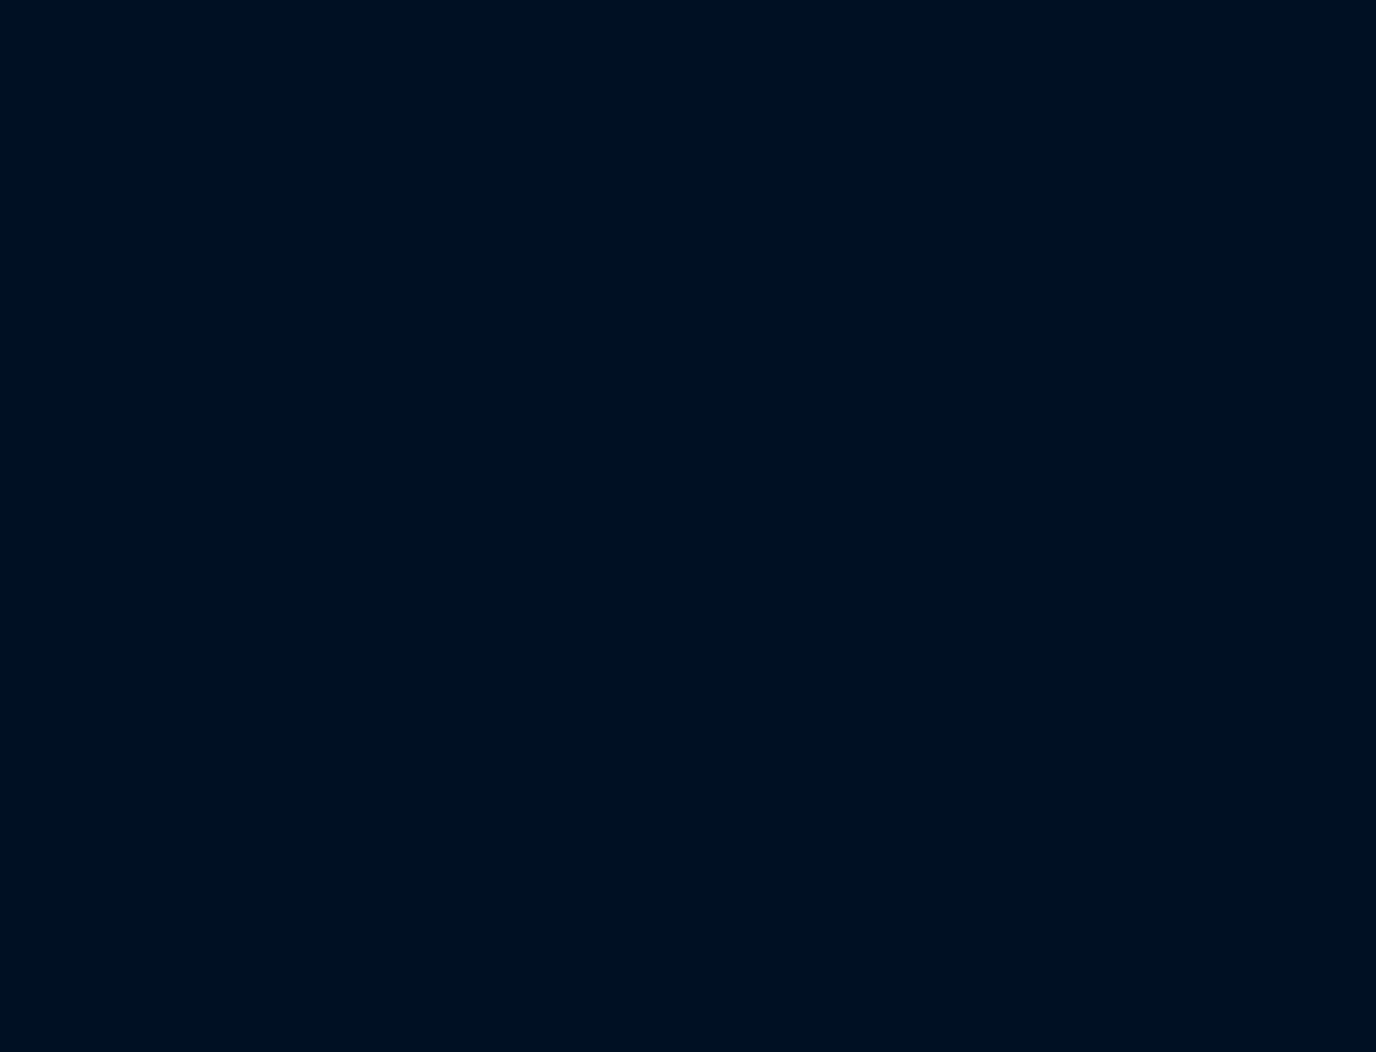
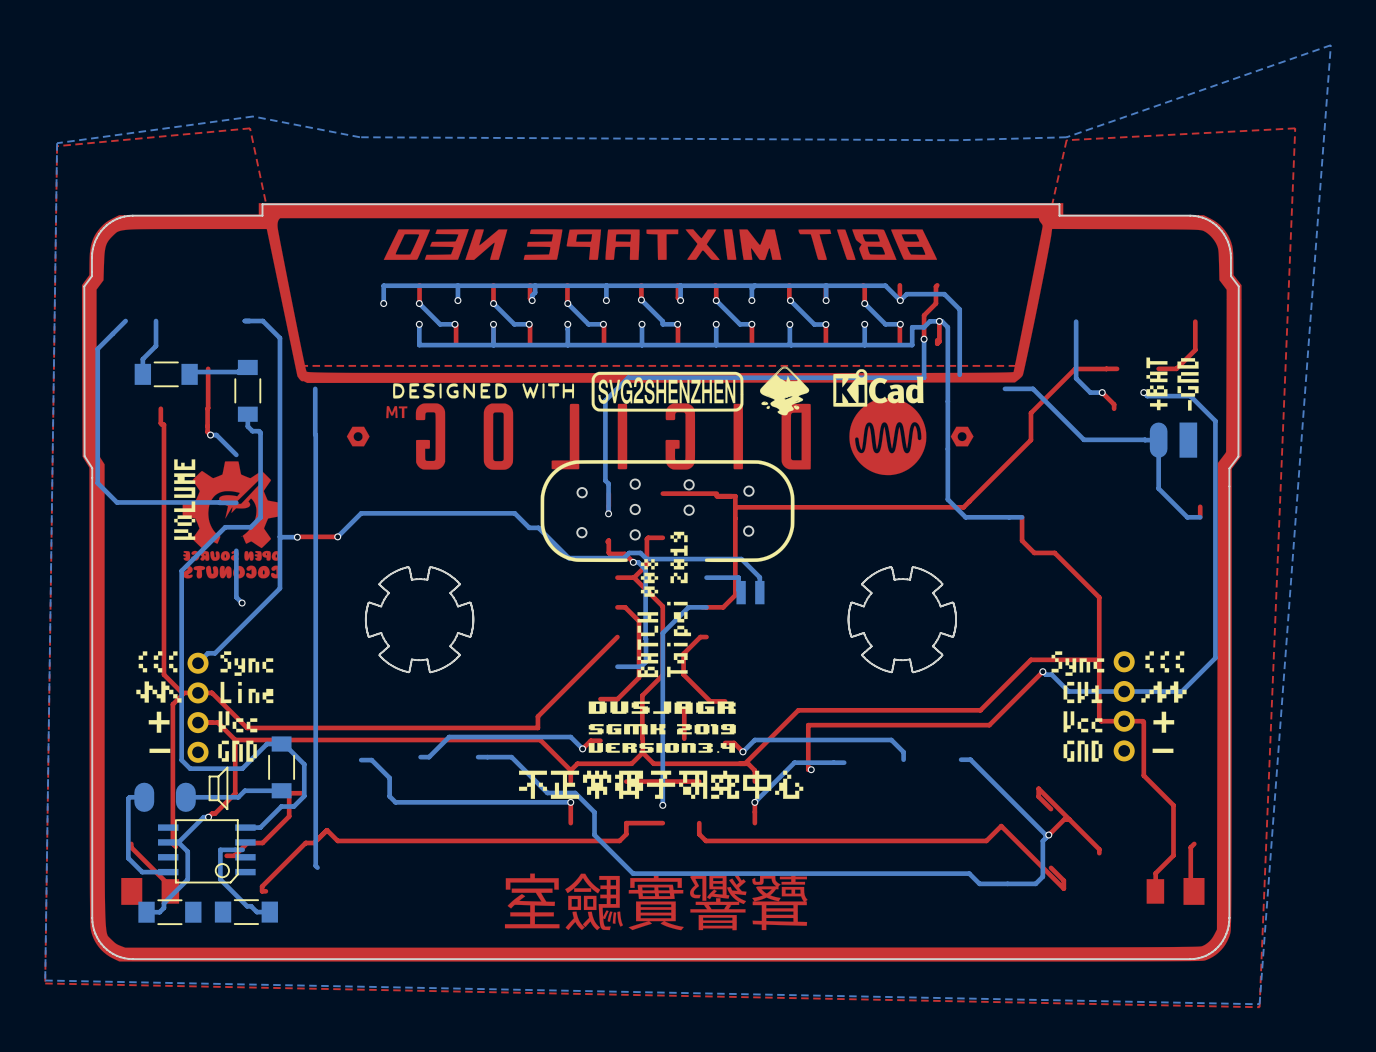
bottom zone outline: none -> (1330, 45) (1066, 137) (956, 140) (359, 137) (253, 116) (57, 143) (45, 980) (1259, 1004) (1330, 45)
top zone outline: none -> (1295, 128) (1066, 140) (1016, 365) (300, 365) (250, 128) (57, 146) (45, 983) (1259, 1007) (1295, 128)
drawing: none -> [81, 203, 1242, 962]
top track: none -> (419, 285) (419, 303)
bottom track: none -> (457, 285) (457, 300)
top track: none -> (493, 285) (493, 303)
top track: none -> (530, 285) (530, 298) (532, 300)
bottom track: none -> (535, 285) (532, 300)
top track: none -> (567, 285) (567, 303)
bottom track: none -> (606, 285) (606, 300)
top track: none -> (641, 285) (641, 299)
top track: none -> (677, 285) (677, 297) (680, 300)
bottom track: none -> (680, 285) (680, 300)
top track: none -> (715, 285) (716, 300)
bottom track: none -> (754, 285) (751, 288) (751, 300)
top track: none -> (789, 285) (790, 300)
bottom track: none -> (826, 285) (826, 300)
top track: none -> (863, 285) (864, 303)
top track: none -> (899, 285) (900, 300)
top track: none -> (937, 285) (935, 303) (924, 315) (924, 339)
bottom track: none -> (641, 299) (662, 321) (662, 324) (677, 324)
via: none -> (641, 299)
via: none -> (457, 300)
via: none -> (532, 300)
via: none -> (606, 300)
via: none -> (680, 300)
bottom track: none -> (716, 300) (740, 324) (751, 324)
via: none -> (716, 300)
via: none -> (751, 300)
bottom track: none -> (790, 300) (814, 324) (825, 324)
via: none -> (790, 300)
via: none -> (826, 300)
via: none -> (900, 300)
bottom track: none -> (383, 303) (383, 285) (885, 285) (900, 300) (906, 294) (944, 294) (959, 309) (959, 374)
via: none -> (383, 303)
bottom track: none -> (419, 303) (440, 324) (454, 324)
via: none -> (419, 303)
bottom track: none -> (493, 303) (514, 324) (529, 324)
via: none -> (493, 303)
bottom track: none -> (567, 303) (588, 324) (603, 324)
via: none -> (567, 303)
bottom track: none -> (864, 303) (885, 324) (900, 324)
via: none -> (864, 303)
bottom track: none -> (125, 321) (97, 348) (97, 483) (116, 502) (236, 502)
bottom track: none -> (156, 321) (156, 346) (142, 359) (142, 374)
bottom track: none -> (244, 321) (262, 321) (279, 338) (279, 588) (215, 653) (207, 653) (198, 663)
top track: none -> (939, 321) (939, 341) (937, 343) (937, 340)
via: none -> (939, 321)
bottom track: none -> (1076, 321) (1076, 378) (1090, 392) (1102, 392)
top track: none -> (1195, 321) (1195, 349) (1176, 368) (1158, 368)
bottom track: none -> (419, 324) (419, 345) (912, 345) (912, 327) (924, 327) (930, 321) (941, 321) (947, 327) (947, 499) (965, 517) (1022, 517)
via: none -> (419, 324)
top track: none -> (454, 324) (456, 343)
via: none -> (454, 324)
bottom track: none -> (493, 324) (493, 345)
via: none -> (493, 324)
top track: none -> (529, 324) (530, 343)
via: none -> (529, 324)
bottom track: none -> (567, 324) (567, 345)
via: none -> (567, 324)
top track: none -> (603, 324) (604, 343)
via: none -> (603, 324)
bottom track: none -> (642, 324) (642, 345)
via: none -> (642, 324)
top track: none -> (677, 324) (677, 343)
via: none -> (677, 324)
bottom track: none -> (716, 324) (716, 345)
via: none -> (716, 324)
top track: none -> (751, 324) (751, 343)
via: none -> (751, 324)
bottom track: none -> (789, 324) (791, 345)
via: none -> (789, 324)
top track: none -> (825, 324) (825, 343)
via: none -> (825, 324)
bottom track: none -> (864, 324) (864, 345)
via: none -> (864, 324)
top track: none -> (900, 324) (899, 343)
via: none -> (900, 324)
bottom track: none -> (924, 339) (924, 377) (628, 377) (605, 400) (605, 480) (608, 483) (608, 513)
via: none -> (924, 339)
bottom track: none -> (247, 367) (242, 367) (238, 372) (191, 372) (189, 374)
top track: none -> (208, 368) (207, 432) (210, 435)
top track: none -> (1106, 368) (1075, 368) (1030, 413) (1030, 439) (963, 507) (735, 507)
top track: none -> (1117, 368) (1106, 368)
part: none -> (166, 374)
bottom track: none -> (315, 388) (315, 865) (317, 867)
bottom track: none -> (1004, 388) (1033, 388) (1083, 439) (1158, 440) (1158, 488) (1187, 517) (1200, 517)
part: none -> (247, 390)
top track: none -> (1102, 392) (1114, 404) (1114, 408)
via: none -> (1102, 392)
bottom track: none -> (1143, 392) (1147, 396) (1190, 396) (1215, 421) (1215, 658) (1181, 691) (1068, 691) (1051, 674) (1045, 674) (1042, 671)
via: none -> (1143, 392)
top track: none -> (160, 408) (160, 423) (163, 424) (163, 674) (182, 692)
bottom track: none -> (247, 414) (247, 426) (252, 431) (260, 432) (260, 517) (250, 527) (225, 527) (181, 570) (181, 760) (190, 768) (242, 768) (266, 743) (283, 743) (304, 764) (304, 796) (293, 806) (281, 806) (260, 827) (245, 827)
bottom track: none -> (210, 435) (216, 435) (236, 454)
via: none -> (210, 435)
part: none -> (1173, 440)
part: none -> (635, 484)
part: none -> (689, 484)
part: none -> (748, 491)
part: none -> (582, 492)
top track: none -> (716, 493) (662, 493)
top track: none -> (716, 496) (735, 496) (735, 595) (723, 607) (702, 607)
top track: none -> (1200, 506) (1200, 517)
part: none -> (635, 509)
part: none -> (689, 510)
via: none -> (608, 513)
top track: none -> (1022, 517) (1022, 540) (1034, 552) (1054, 552) (1099, 597) (1099, 719) (1101, 721) (1143, 722) (1143, 775) (1173, 805) (1173, 855) (1155, 873) (1155, 891)
part: none -> (748, 531)
part: none -> (581, 532)
part: none -> (635, 534)
bottom track: none -> (279, 536) (297, 537)
top track: none -> (337, 536) (297, 537)
bottom track: none -> (337, 536) (361, 513) (514, 513) (529, 527) (538, 527) (568, 558) (623, 558) (629, 552) (640, 552) (646, 559) (741, 559) (759, 577) (759, 592)
via: none -> (337, 536)
via: none -> (297, 537)
top track: none -> (662, 537) (646, 539) (646, 564) (634, 577)
top track: none -> (607, 541) (608, 540) (609, 553) (624, 553) (633, 562)
bottom track: none -> (236, 550) (236, 597) (242, 603)
bottom track: none -> (633, 562) (638, 562) (645, 569) (645, 661) (641, 666) (617, 666)
via: none -> (633, 562)
top track: none -> (634, 577) (662, 606) (662, 675) (642, 695) (642, 752)
top track: none -> (634, 577) (617, 577)
bottom track: none -> (706, 577) (738, 577) (738, 590) (741, 592)
part: none -> (750, 592)
via: none -> (242, 603)
top track: none -> (617, 607) (625, 607) (639, 621) (639, 677) (617, 699) (600, 699)
bottom track: none -> (706, 607) (688, 607) (662, 633) (662, 805)
top track: none -> (617, 637) (537, 716) (537, 727) (247, 727) (212, 692) (182, 692)
top track: none -> (706, 637) (700, 637) (683, 653) (683, 674) (710, 701) (725, 701)
top track: none -> (1099, 659) (1030, 659) (980, 710) (798, 710) (744, 763)
top track: none -> (1042, 671) (989, 725) (808, 725) (808, 769) (811, 769)
via: none -> (1042, 671)
top track: none -> (182, 692) (172, 704) (172, 843) (175, 846)
part: none -> (1124, 706)
part: none -> (198, 707)
top track: none -> (683, 709) (684, 738)
top track: none -> (198, 722) (217, 722) (235, 740)
top track: none -> (235, 740) (235, 793) (214, 813) (208, 817)
top track: none -> (235, 740) (540, 740) (570, 770)
top track: none -> (600, 740) (590, 740) (582, 748)
top track: none -> (725, 742) (734, 742) (742, 751)
bottom track: none -> (582, 748) (570, 737) (449, 737) (429, 757) (420, 757)
via: none -> (582, 748)
bottom track: none -> (742, 751) (754, 740) (891, 740) (903, 752) (903, 759)
via: none -> (742, 751)
top track: none -> (642, 752) (631, 763) (577, 763) (570, 770)
top track: none -> (642, 752) (653, 763) (748, 763) (754, 770) (754, 781)
bottom track: none -> (478, 757) (511, 757) (547, 793) (575, 793) (594, 812) (594, 835) (633, 873) (969, 873) (979, 883) (1035, 883) (1042, 876) (1042, 840) (1048, 835)
bottom track: none -> (961, 759) (970, 759) (1045, 834) (1045, 837)
bottom track: none -> (361, 760) (371, 760) (389, 778) (389, 796) (395, 802) (570, 802)
bottom track: none -> (844, 762) (794, 762) (754, 802)
part: none -> (281, 767)
via: none -> (811, 769)
top track: none -> (570, 770) (570, 781)
top track: none -> (699, 781) (626, 781)
part: none -> (181, 789)
bottom track: none -> (281, 790) (244, 790) (238, 797) (182, 797)
top track: none -> (301, 793) (289, 793) (289, 816) (262, 843) (247, 843) (234, 855) (226, 855)
bottom track: none -> (144, 797) (128, 798) (128, 858) (142, 872) (168, 872)
top track: none -> (570, 802) (570, 823)
via: none -> (570, 802)
top track: none -> (754, 802) (754, 823)
via: none -> (754, 802)
via: none -> (662, 805)
top track: none -> (1051, 809) (1038, 796) (1038, 788) (1099, 849) (1099, 853)
bottom track: none -> (208, 817) (203, 817) (178, 842)
via: none -> (208, 817)
top track: none -> (1069, 819) (1064, 819) (1048, 835)
top track: none -> (662, 823) (626, 823) (626, 834) (619, 840) (337, 840) (326, 830) (314, 843) (305, 843) (262, 886) (262, 891) (265, 891)
top track: none -> (699, 823) (699, 834) (705, 840) (986, 840) (1001, 826) (1063, 888) (1063, 880) (1051, 867)
via: none -> (1048, 835)
bottom track: none -> (178, 842) (187, 851) (187, 879) (163, 903) (163, 907) (159, 912) (149, 912)
top track: none -> (131, 843) (131, 847) (170, 886) (170, 891)
top track: none -> (1194, 843) (1190, 847) (1190, 891)
bottom track: none -> (242, 849) (220, 849) (220, 879) (247, 906) (251, 906) (256, 912) (269, 912)
part: none -> (206, 851)
part: none -> (150, 891)
part: none -> (1175, 891)
part: none -> (169, 912)
part: none -> (246, 912)

